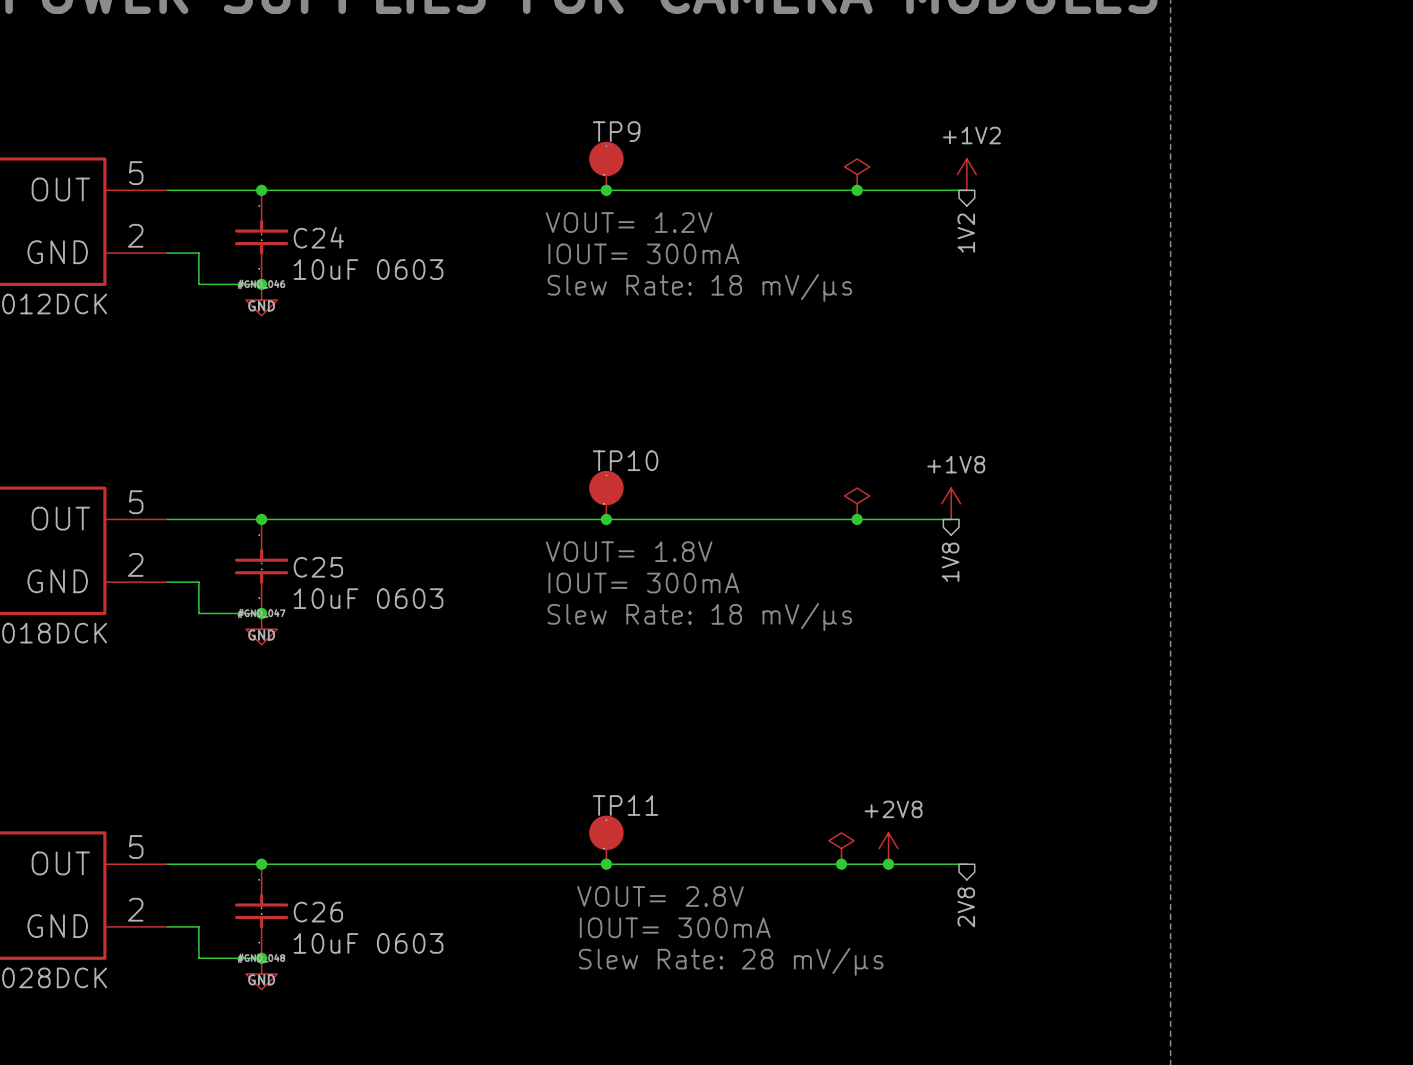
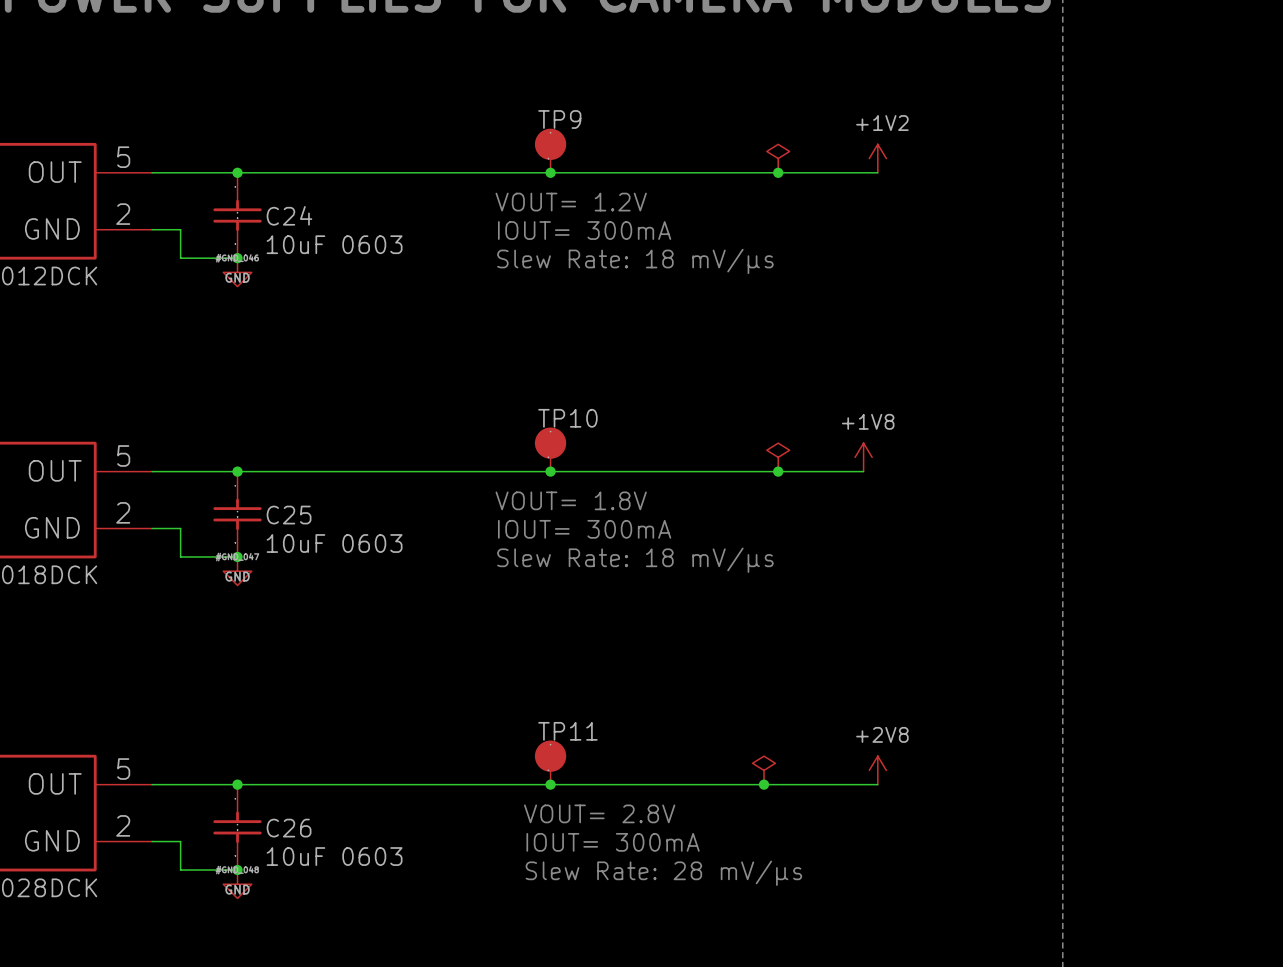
hierarchical label: 1V2 (966, 233) -> none
hierarchical label: 1V8 (950, 562) -> none
power symbol position: +2V8 (888, 848) -> +2V8 (877, 770)
junction: (888, 864) -> none
hierarchical label: 2V8 (966, 907) -> none

